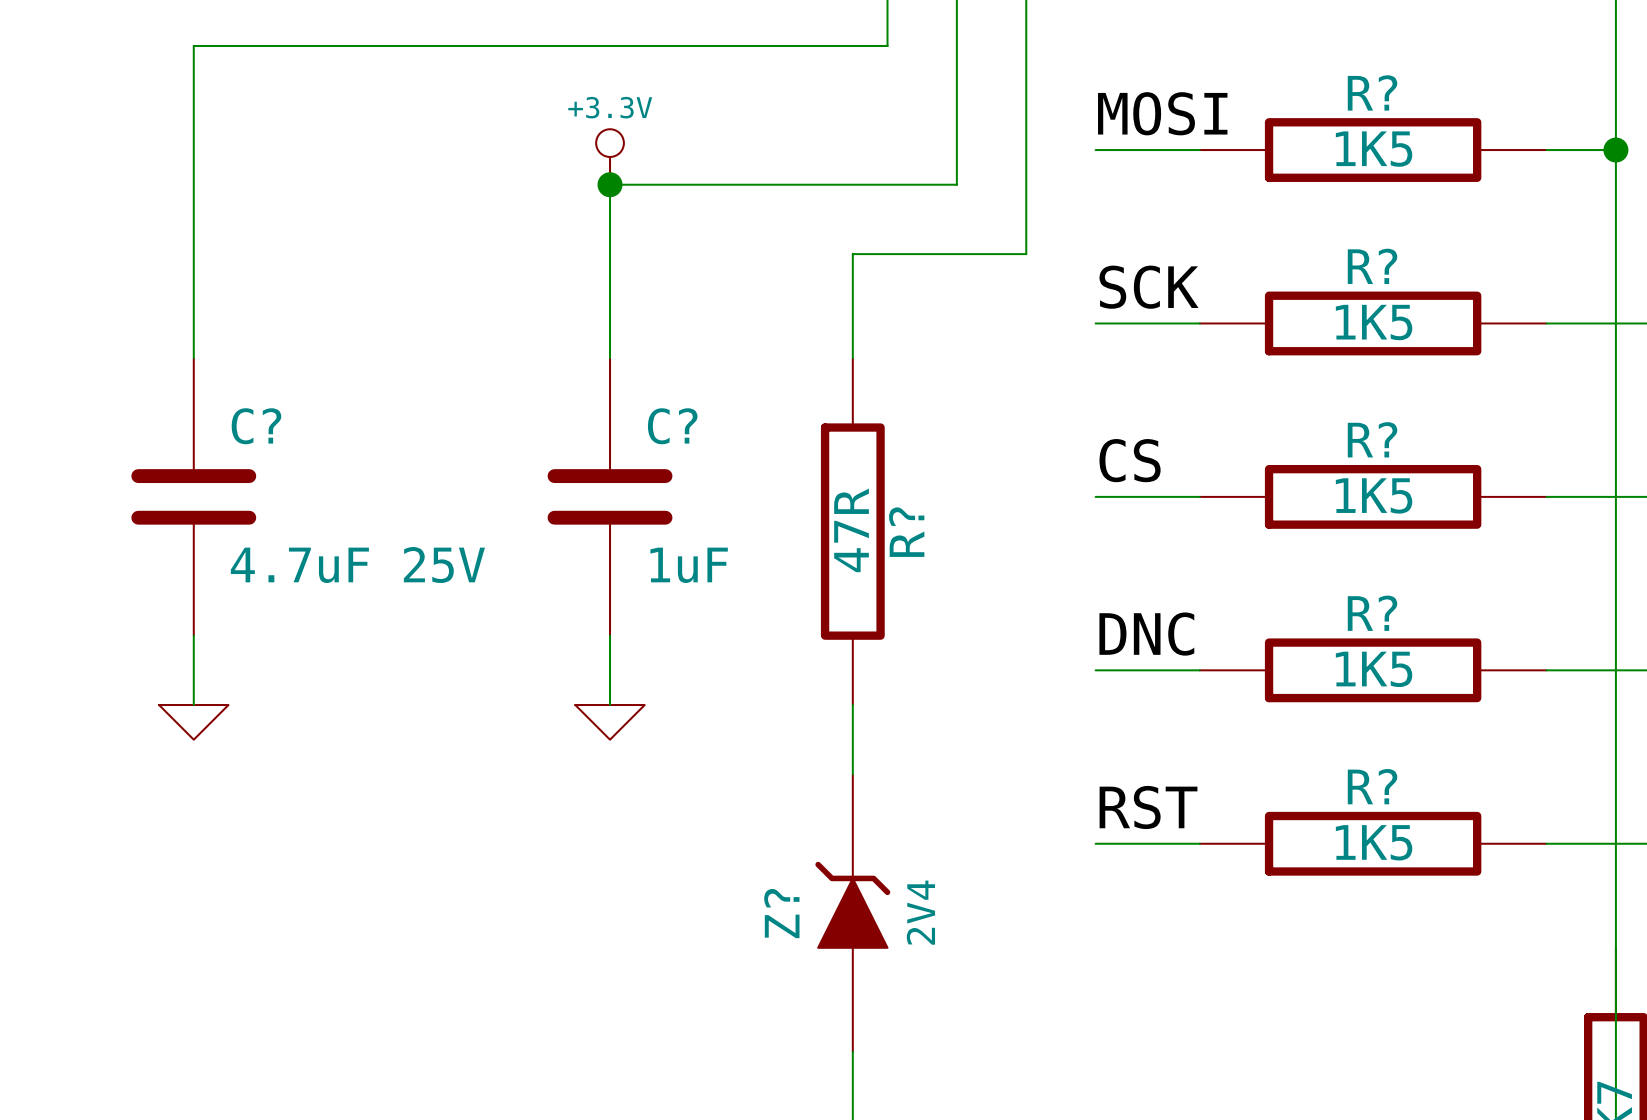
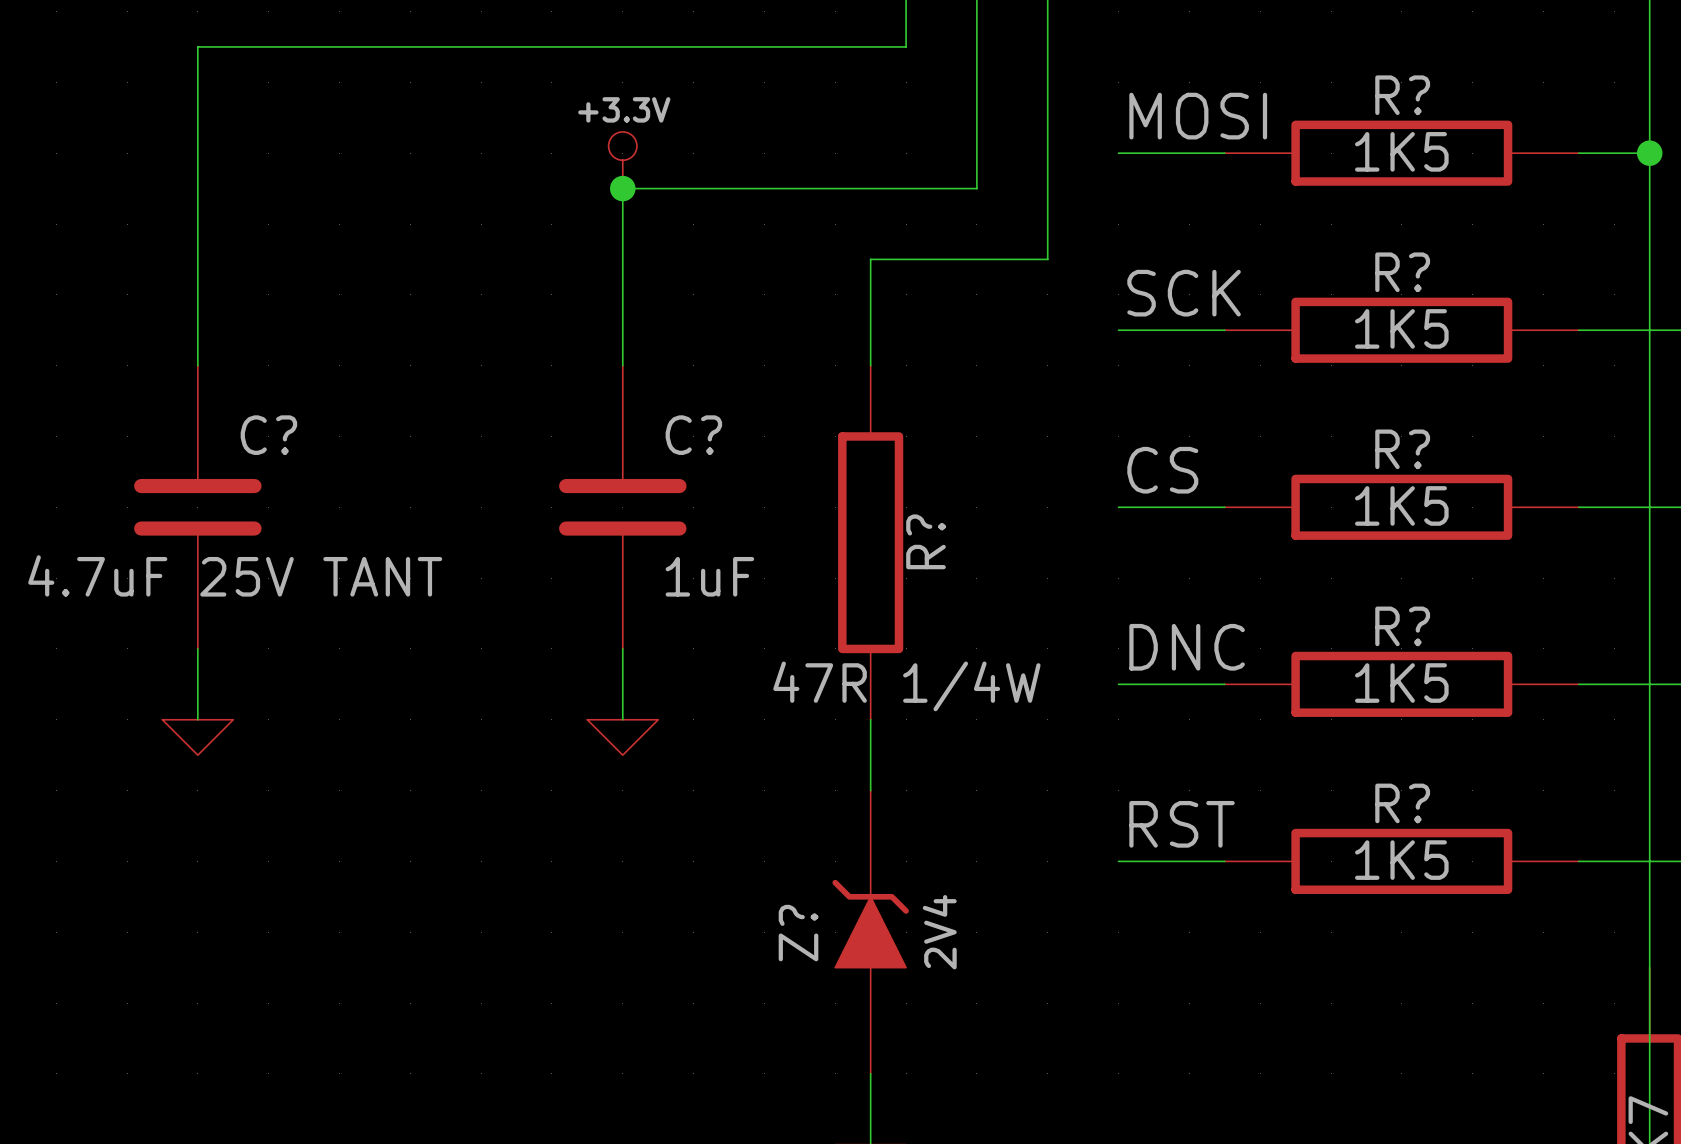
R? value: 47R (851, 530) -> 47R 1/4W (906, 686)
C? value: 4.7uF 25V (357, 565) -> 4.7uF 25V TANT (235, 575)

